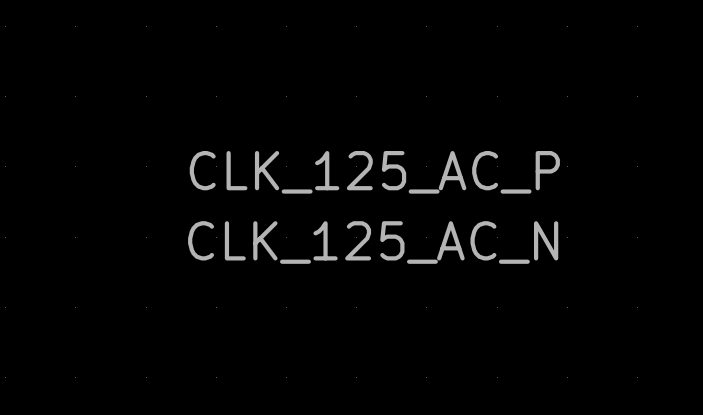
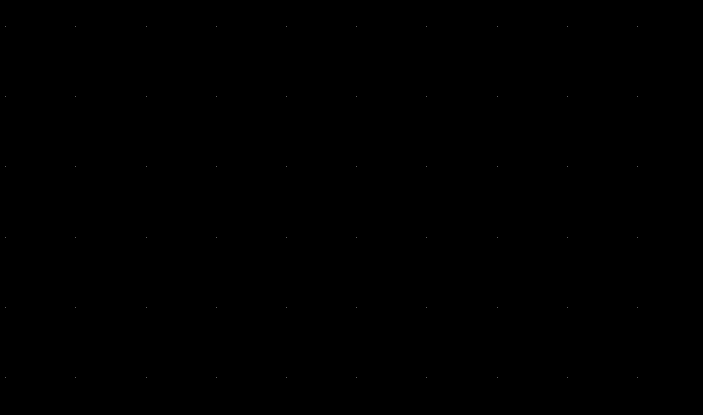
label: CLK_125_AC_P (374, 172) -> none
label: CLK_125_AC_N (373, 242) -> none

